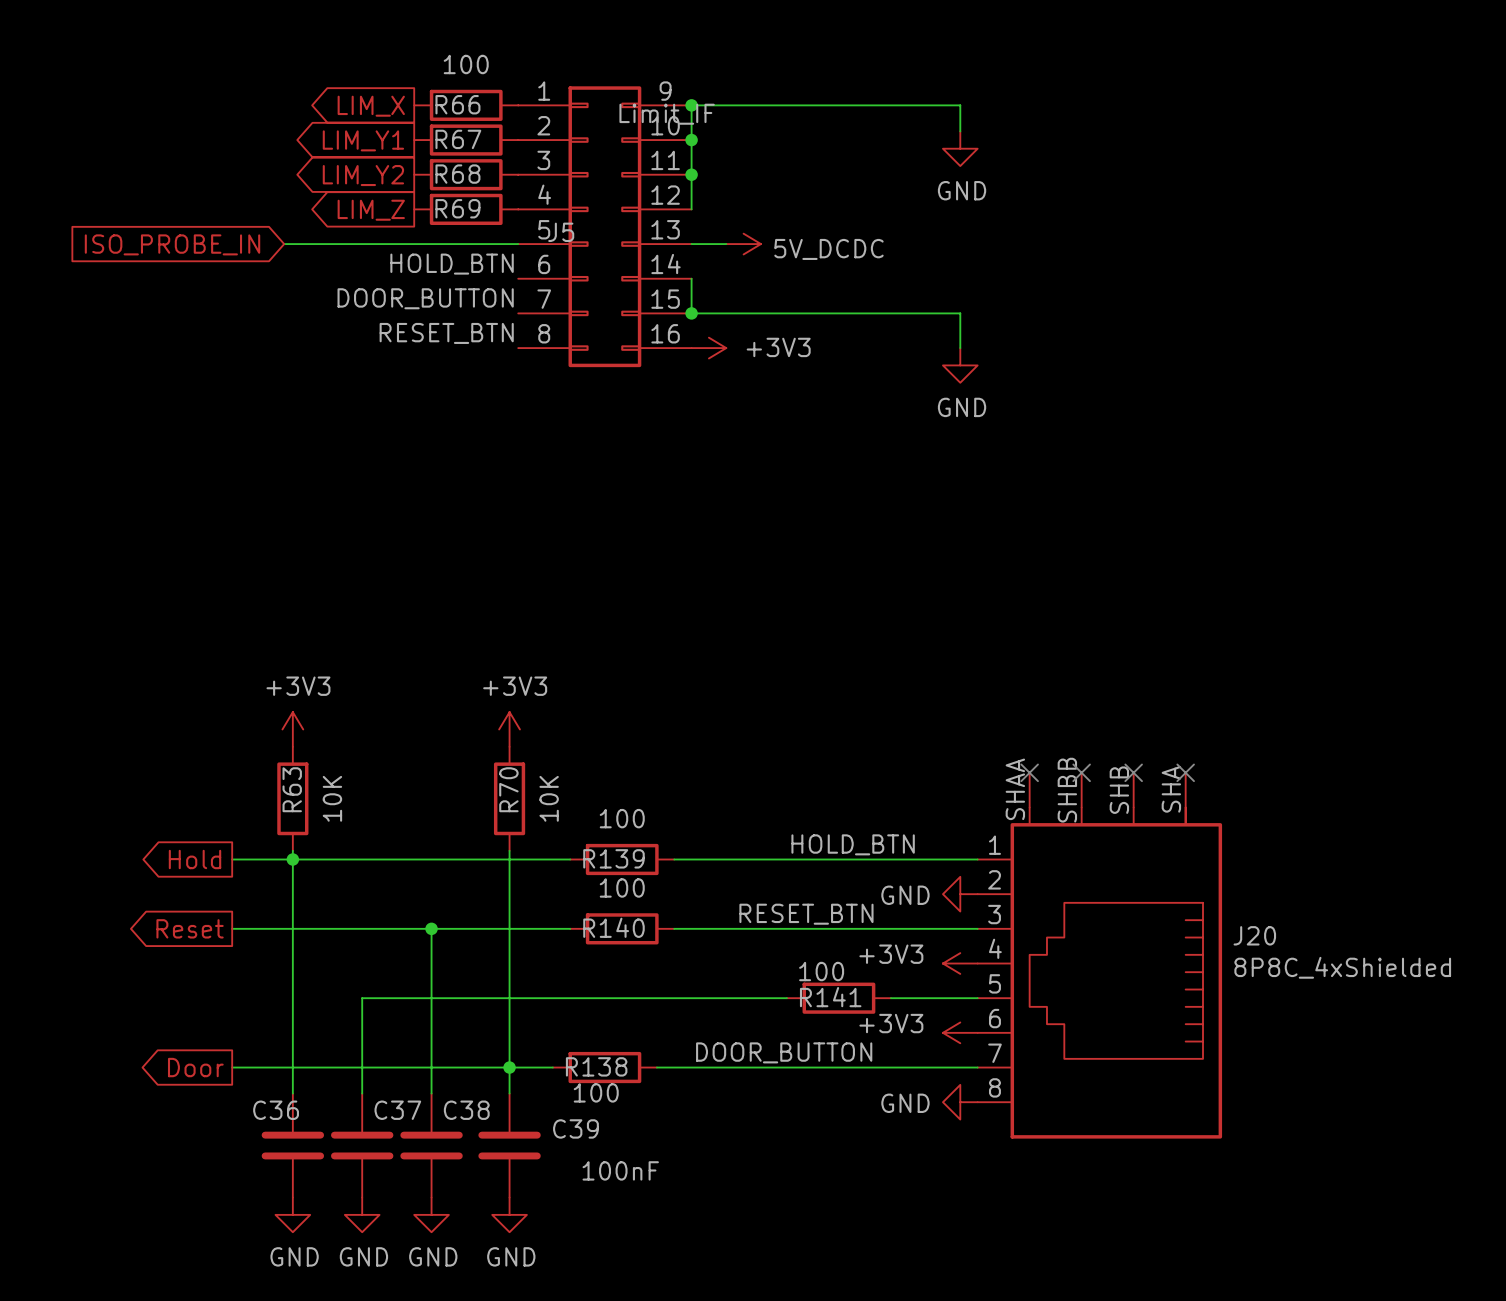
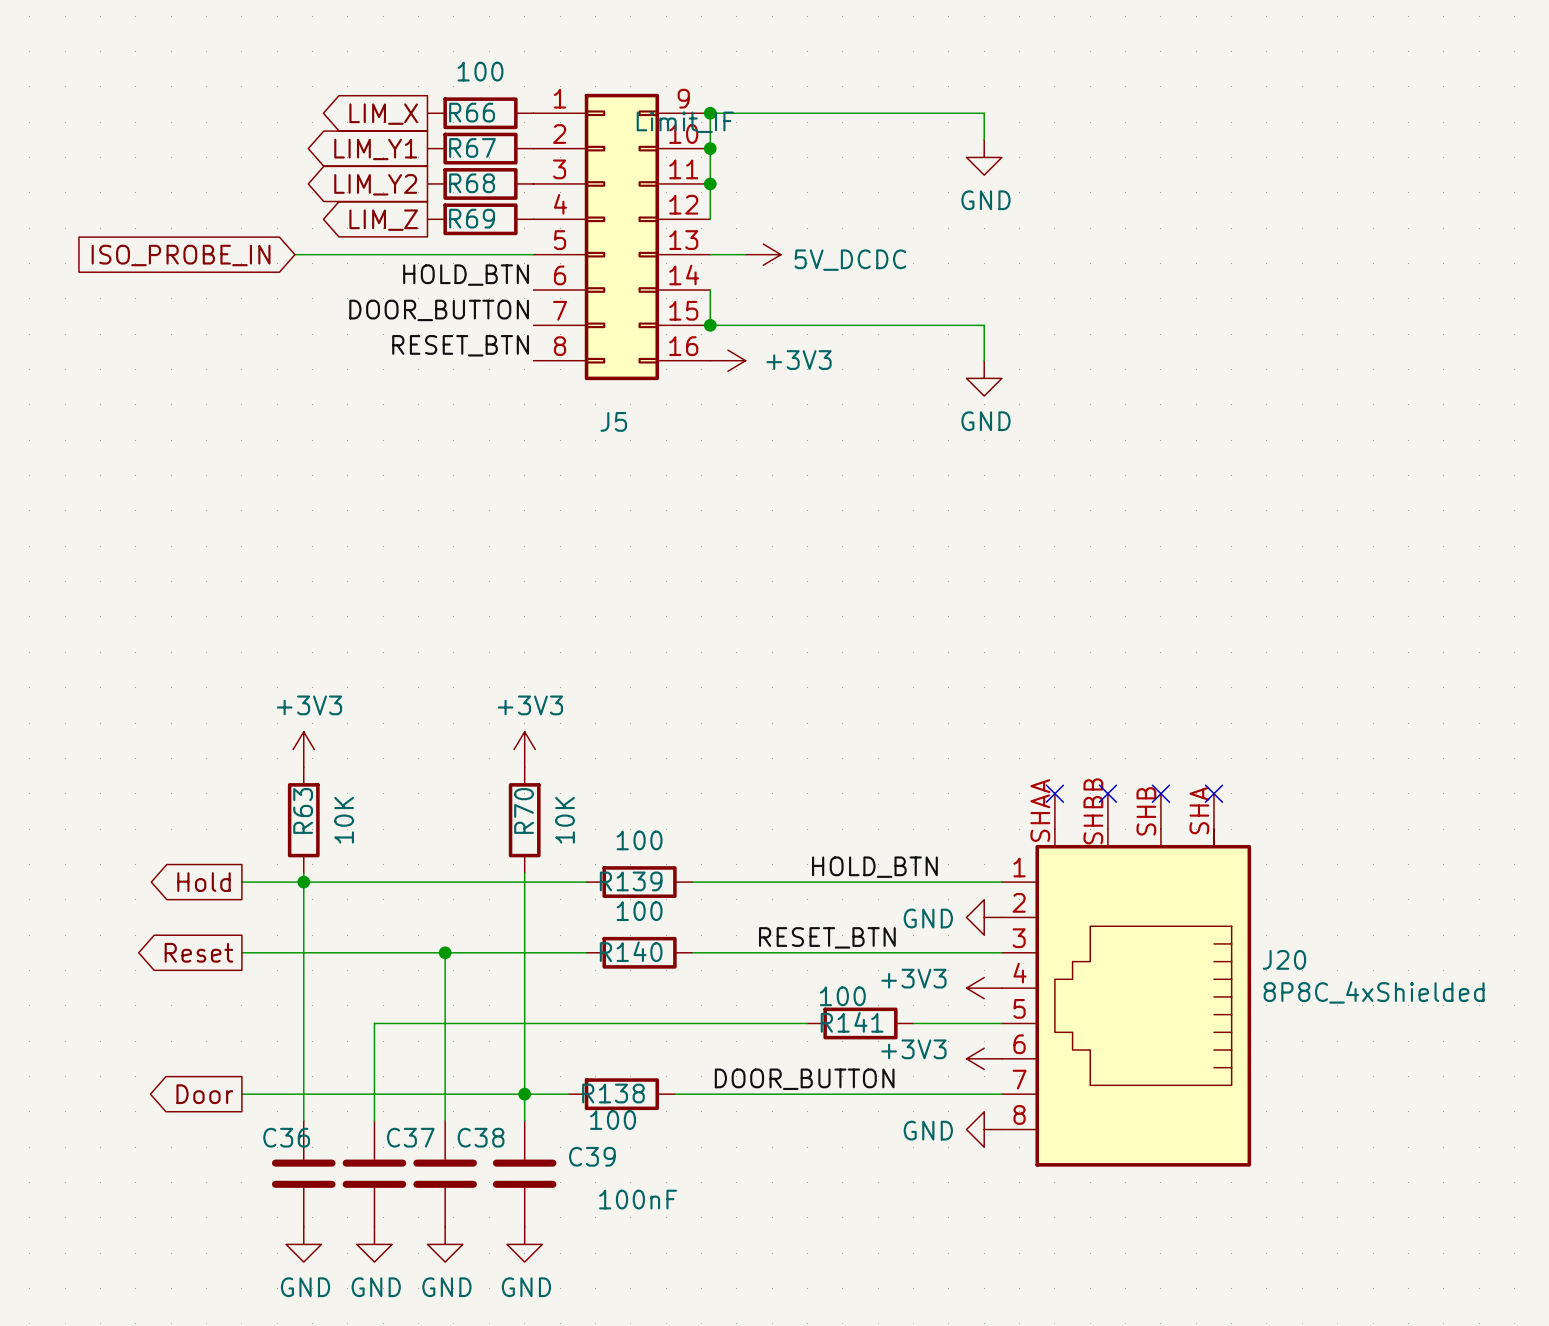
J5 name position: J5 (561, 232) -> J5 (613, 421)

